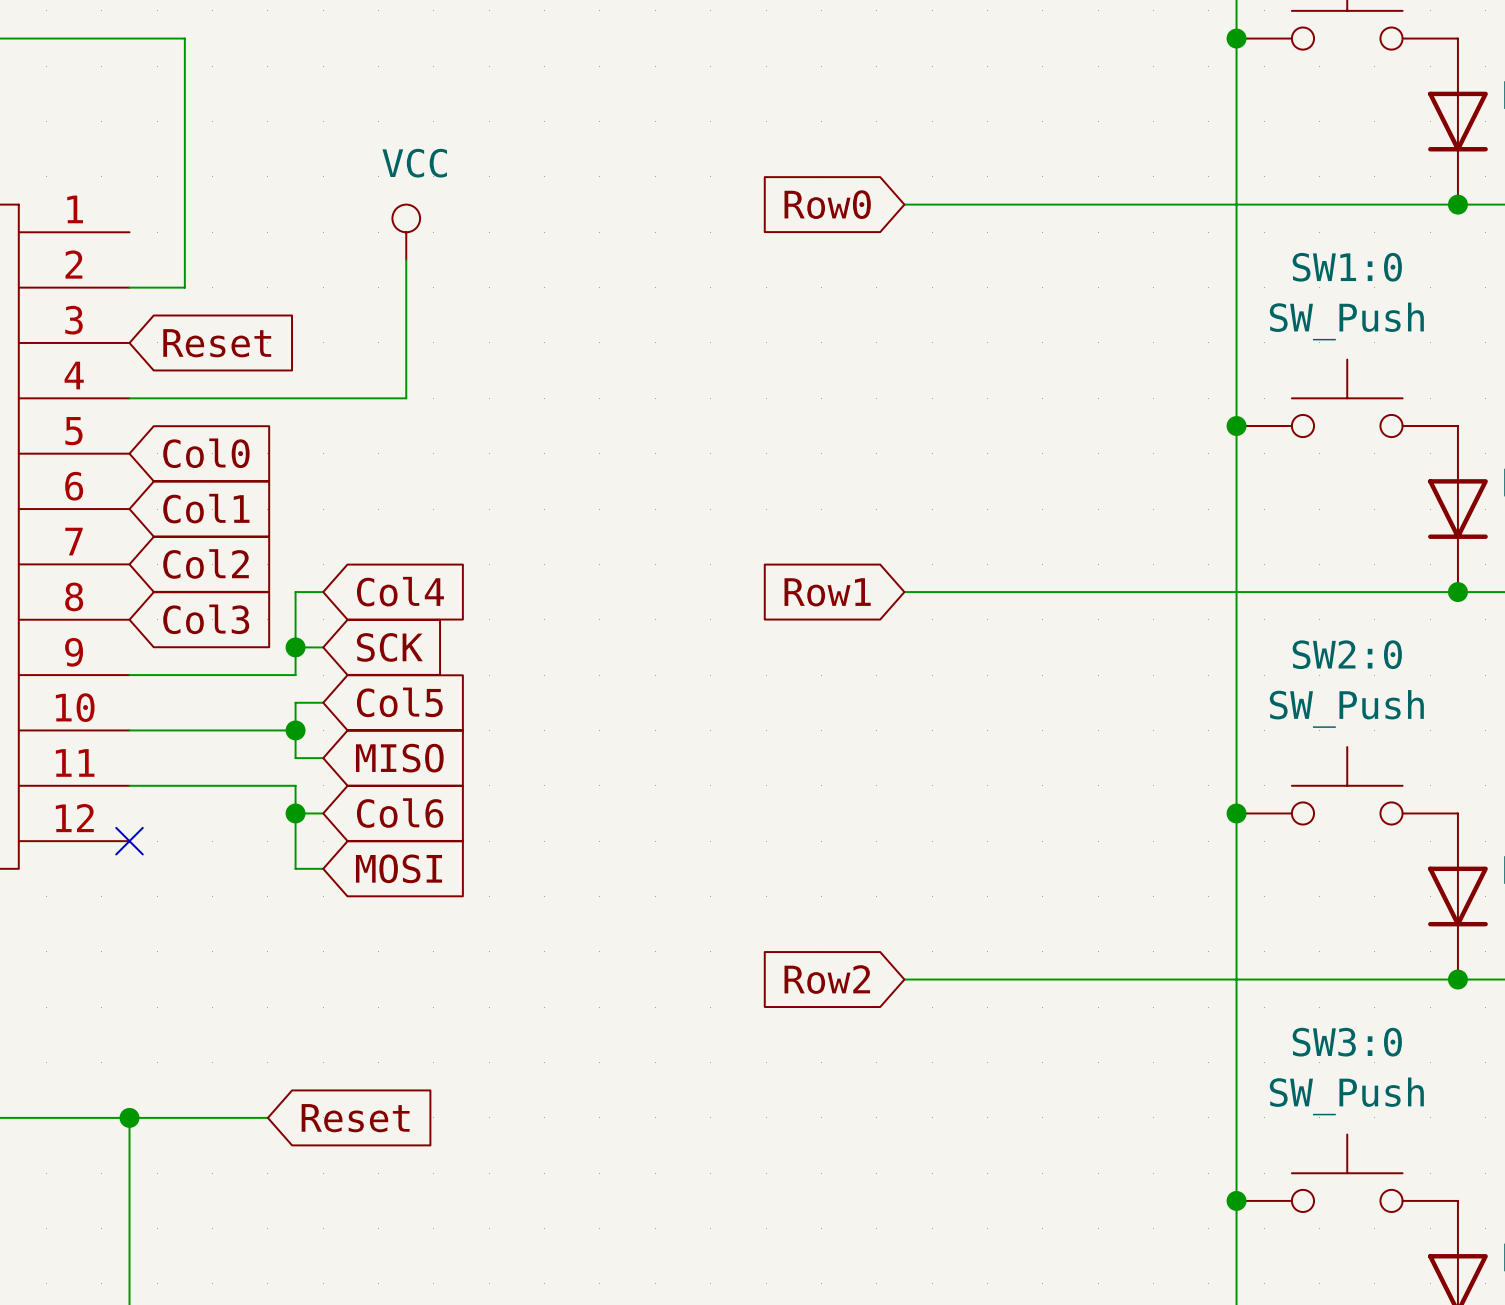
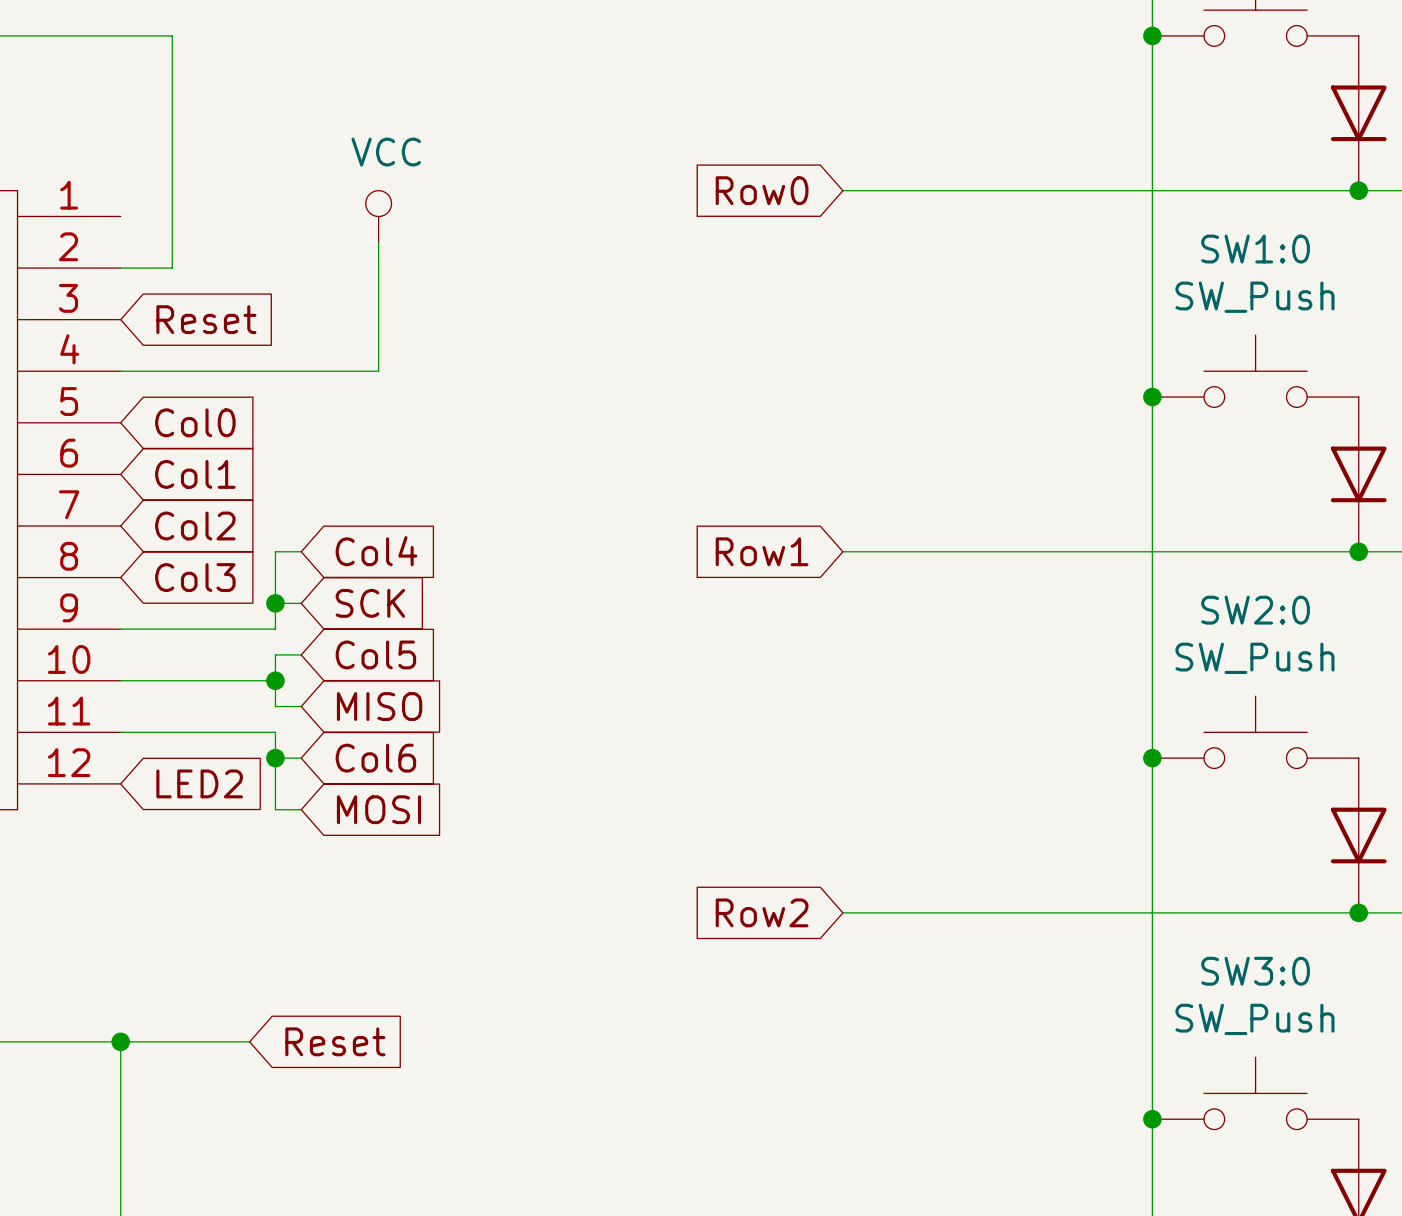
global label: none -> LED2 (199, 783)
no-connect mark: (129, 841) -> none

